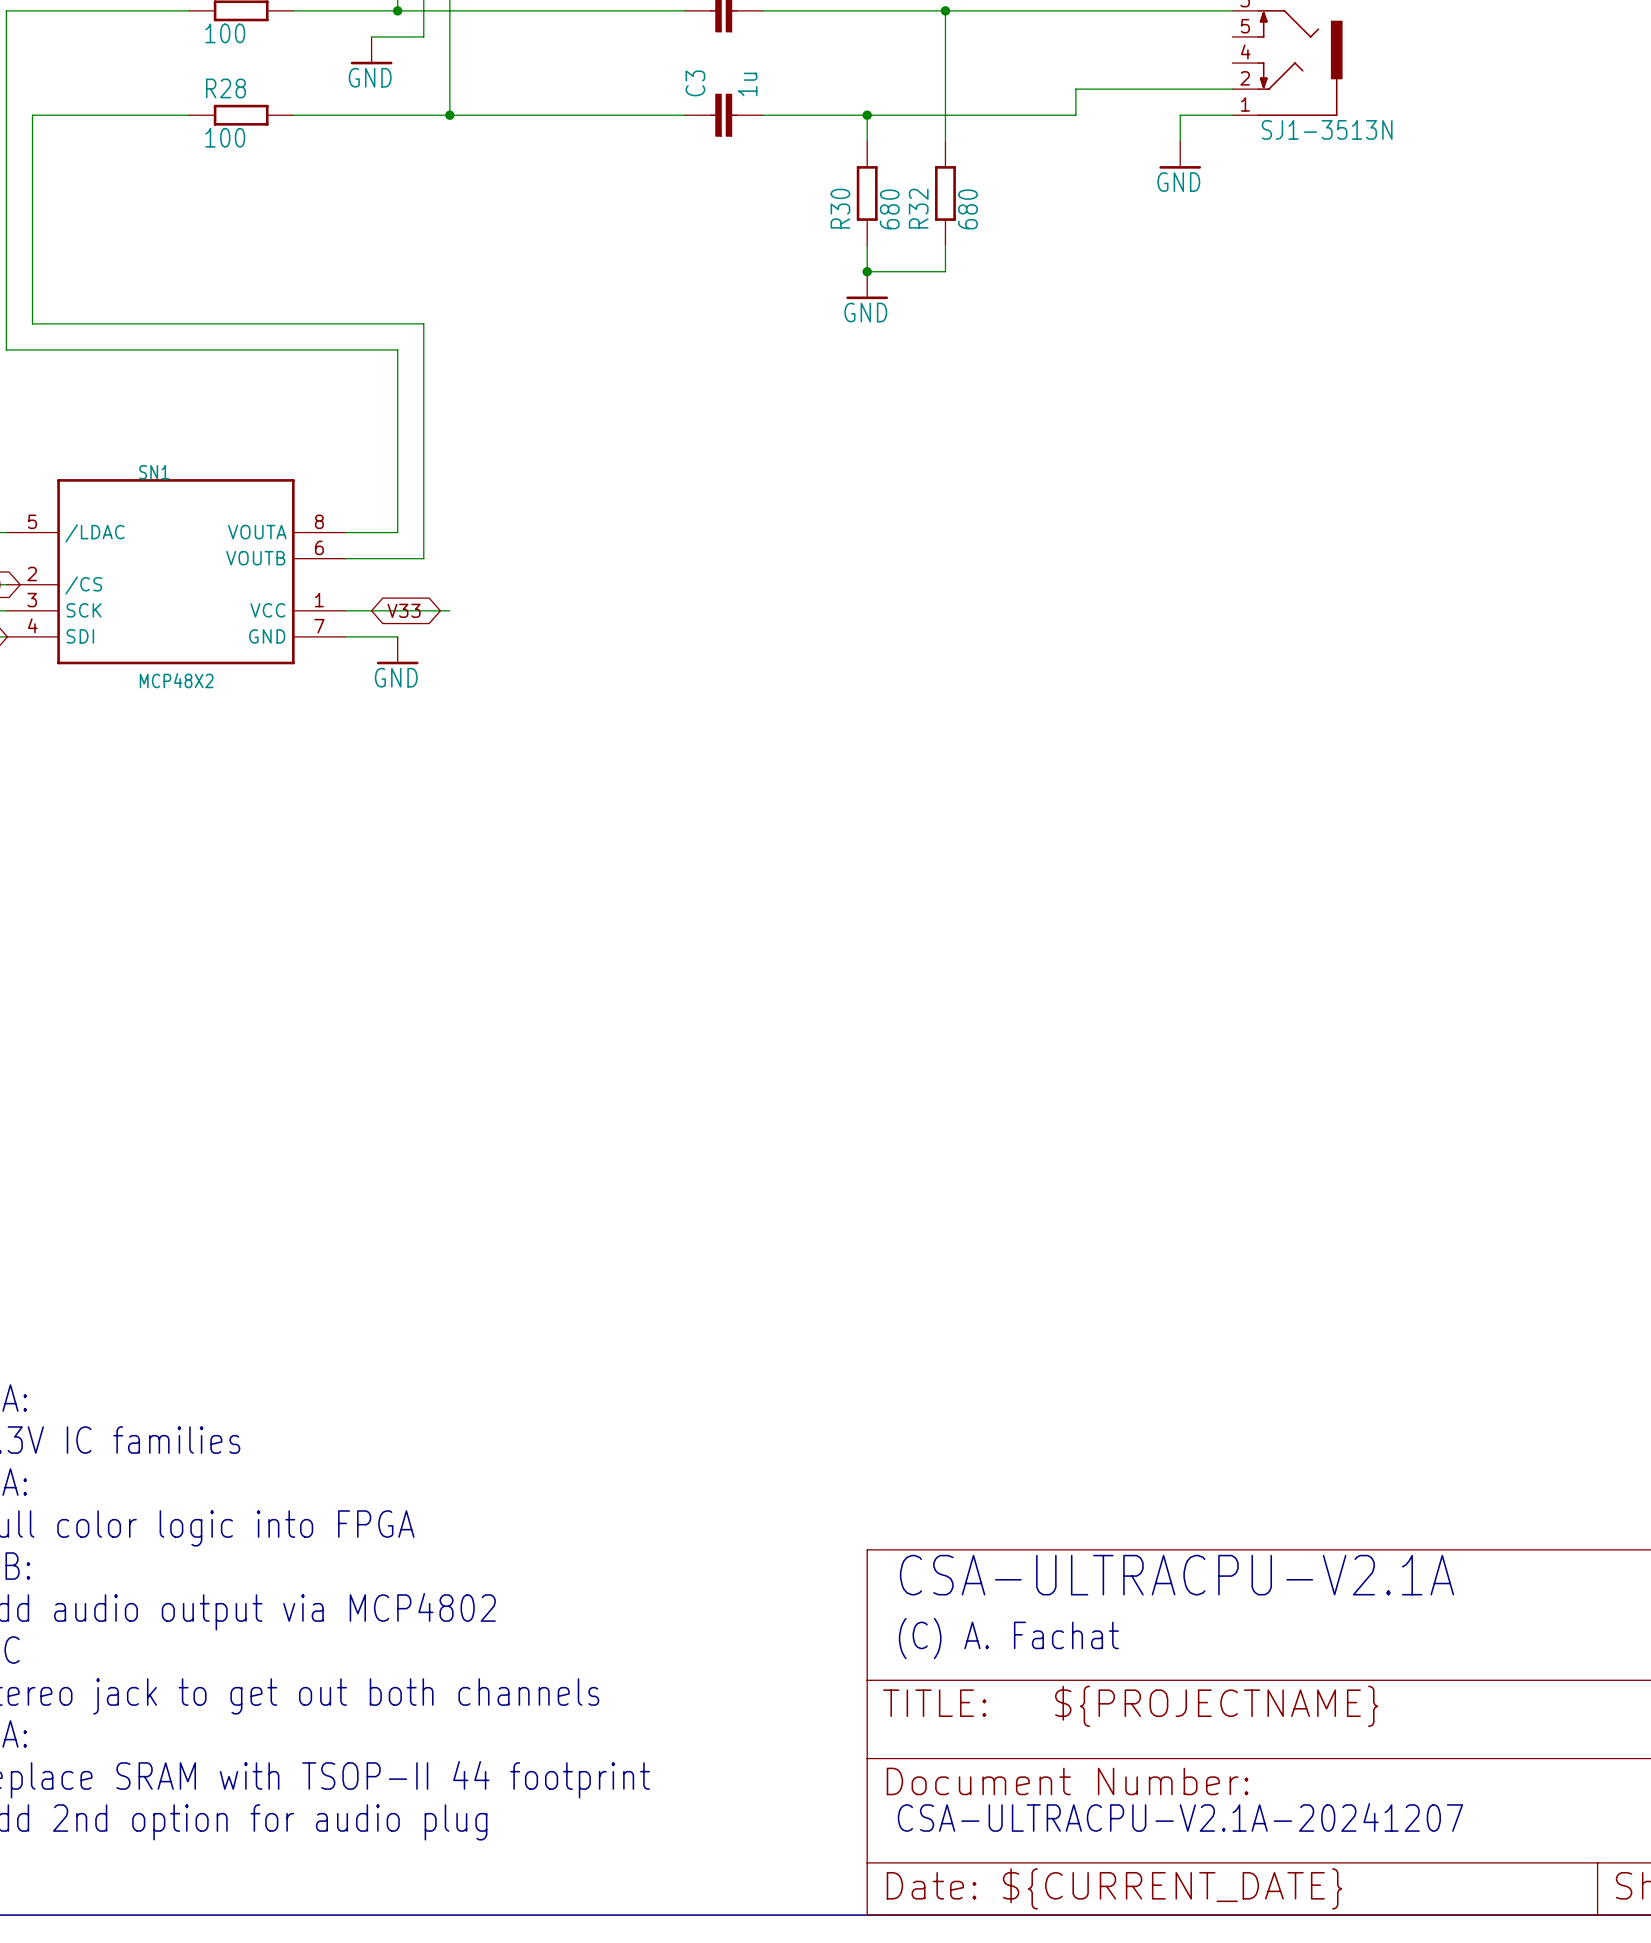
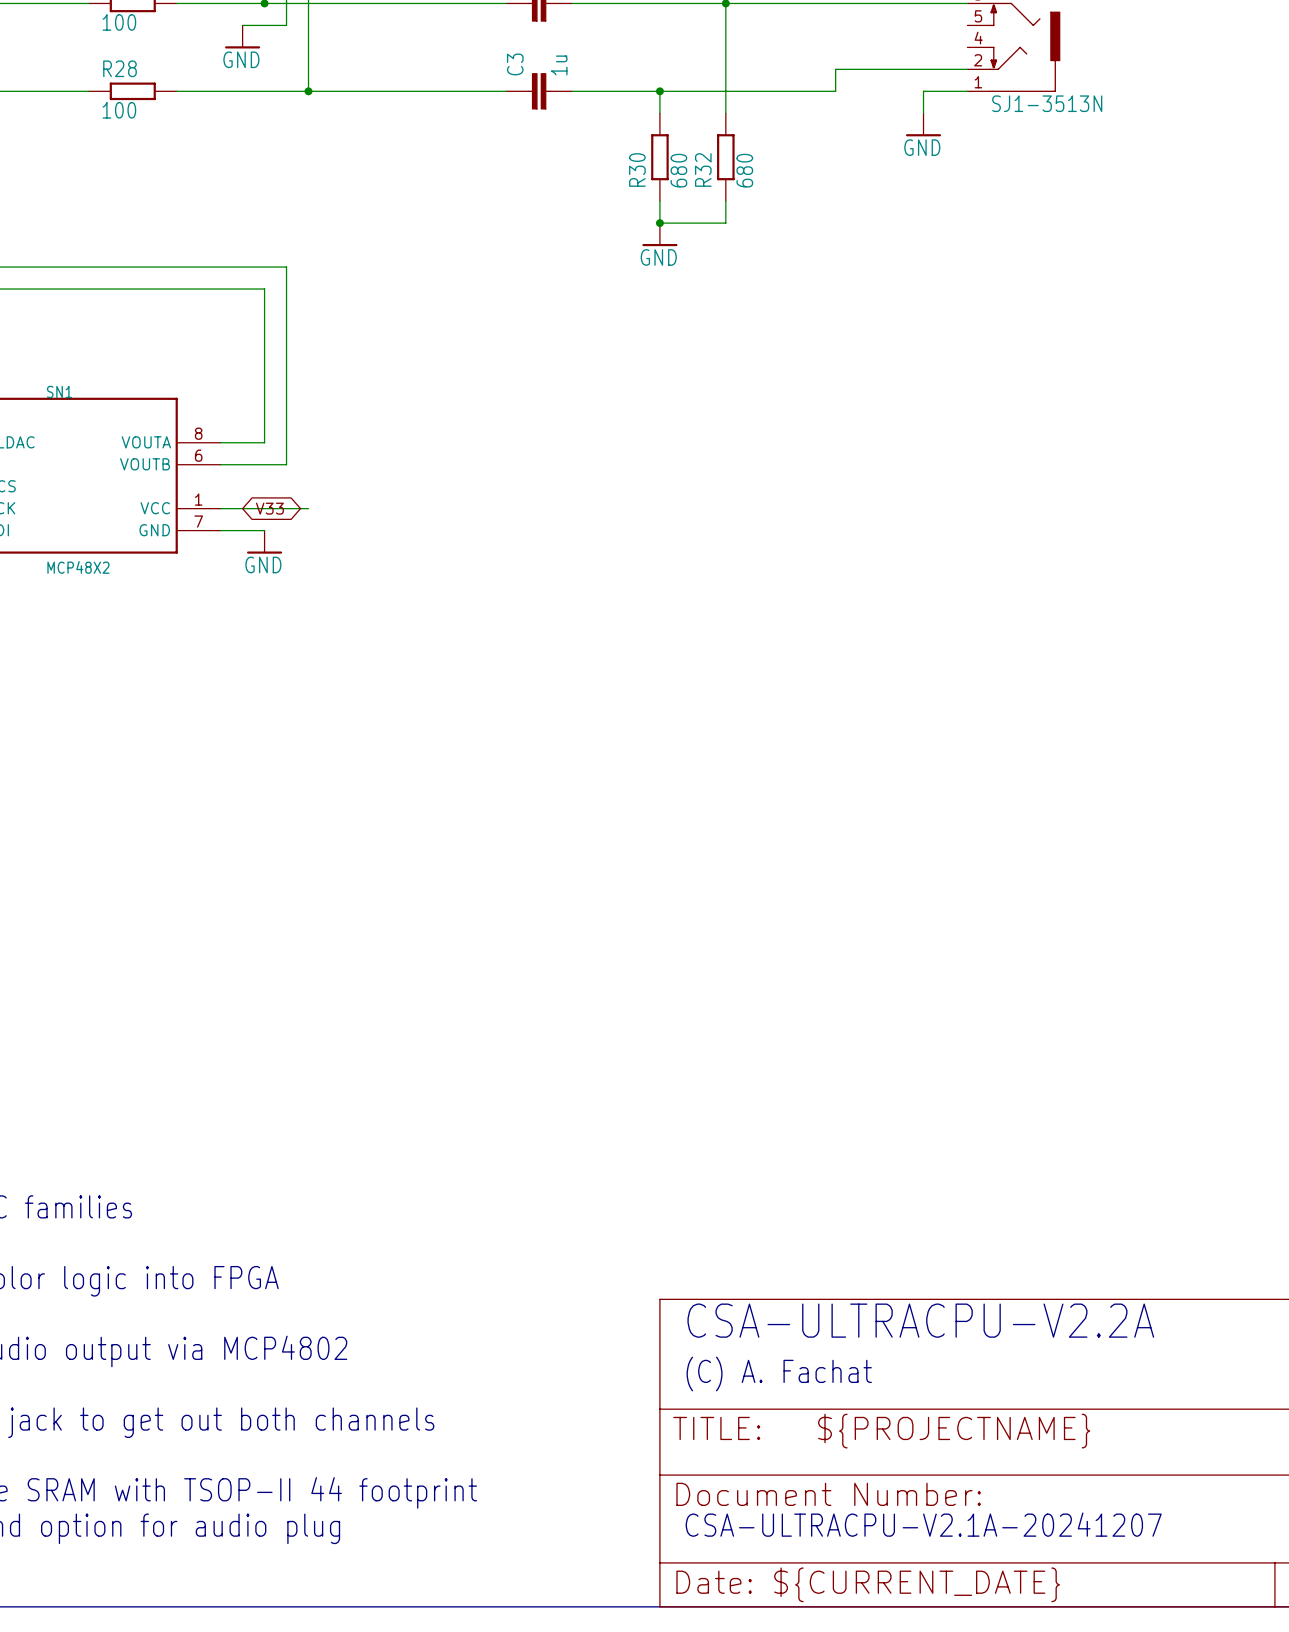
text: CSA-ULTRACPU-V2.1A (1177, 1575) -> CSA-ULTRACPU-V2.2A (920, 1320)

